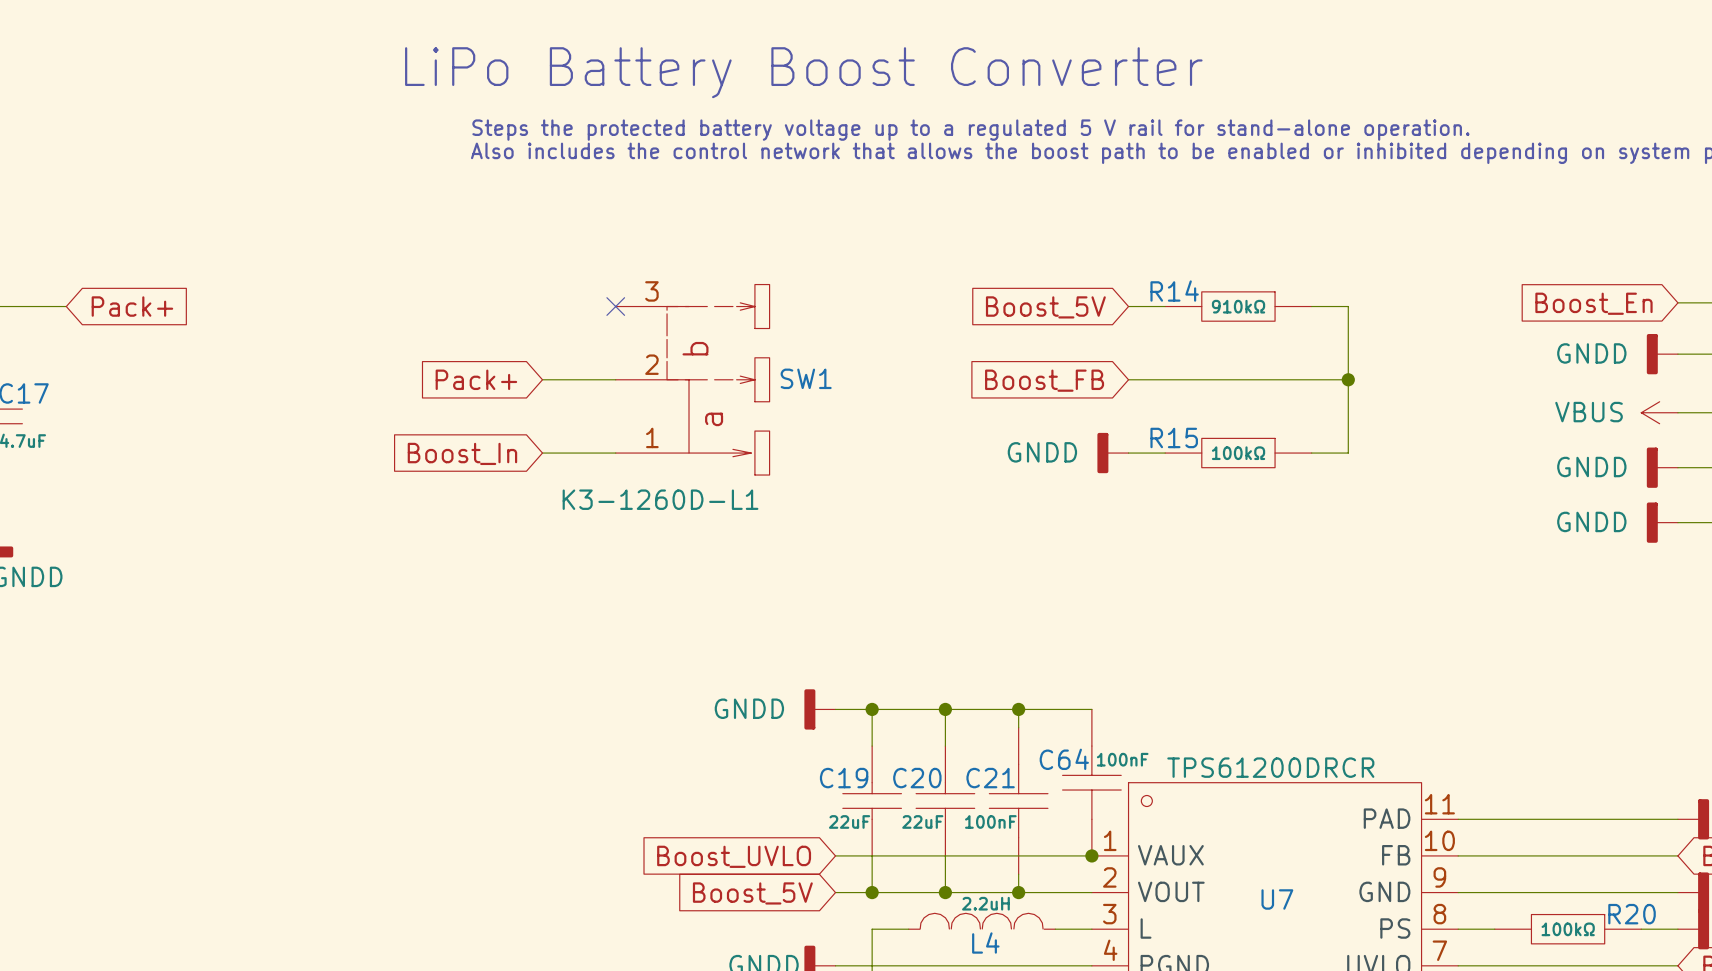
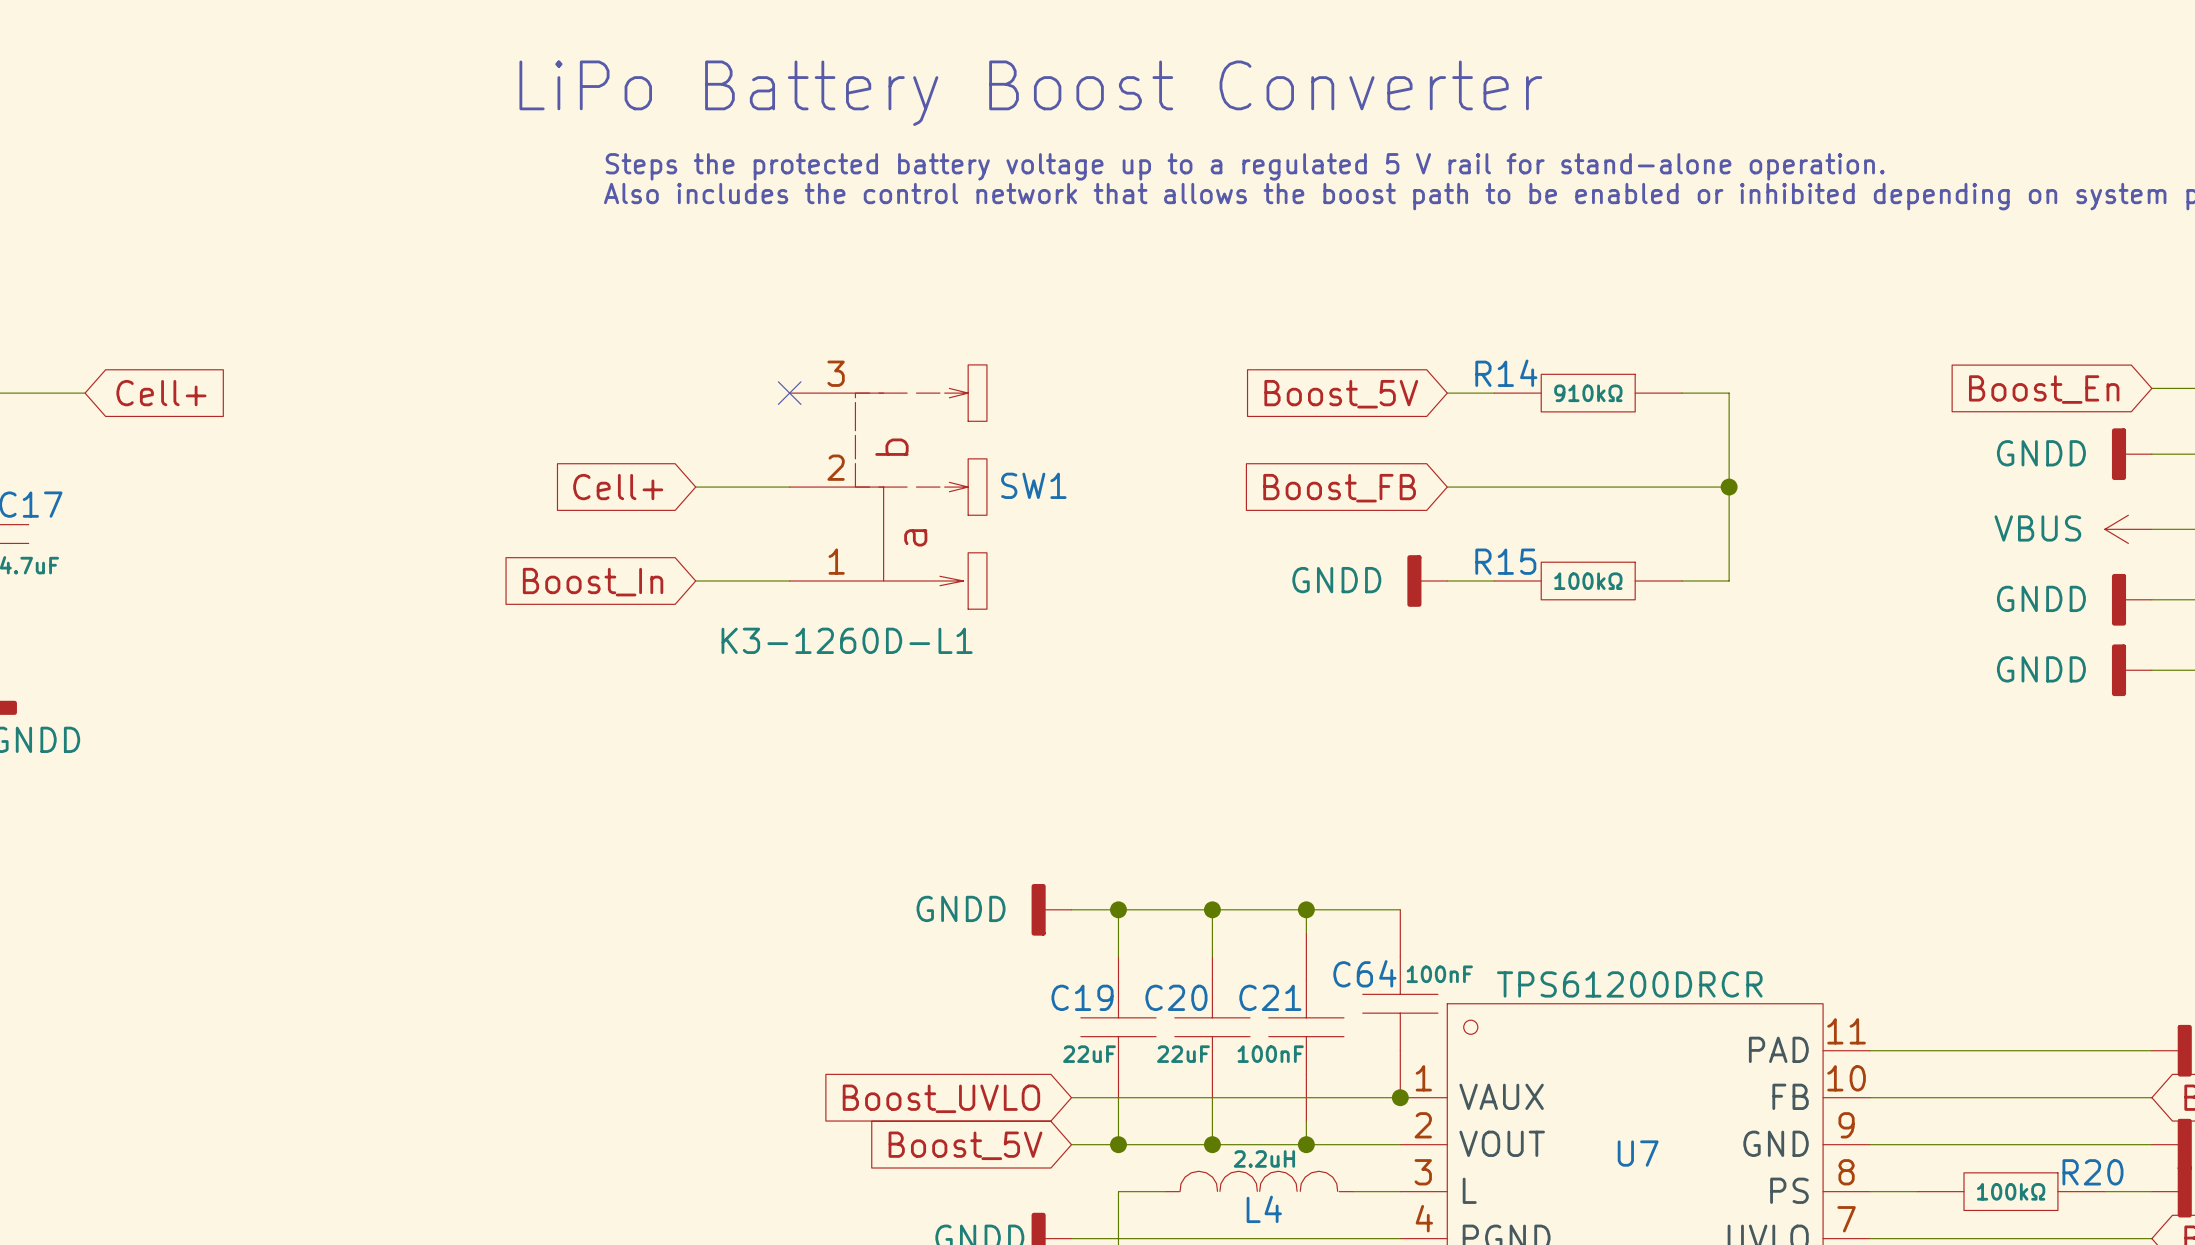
global label: Pack+ (132, 306) -> Cell+ (161, 393)
global label: Pack+ (476, 379) -> Cell+ (618, 487)

